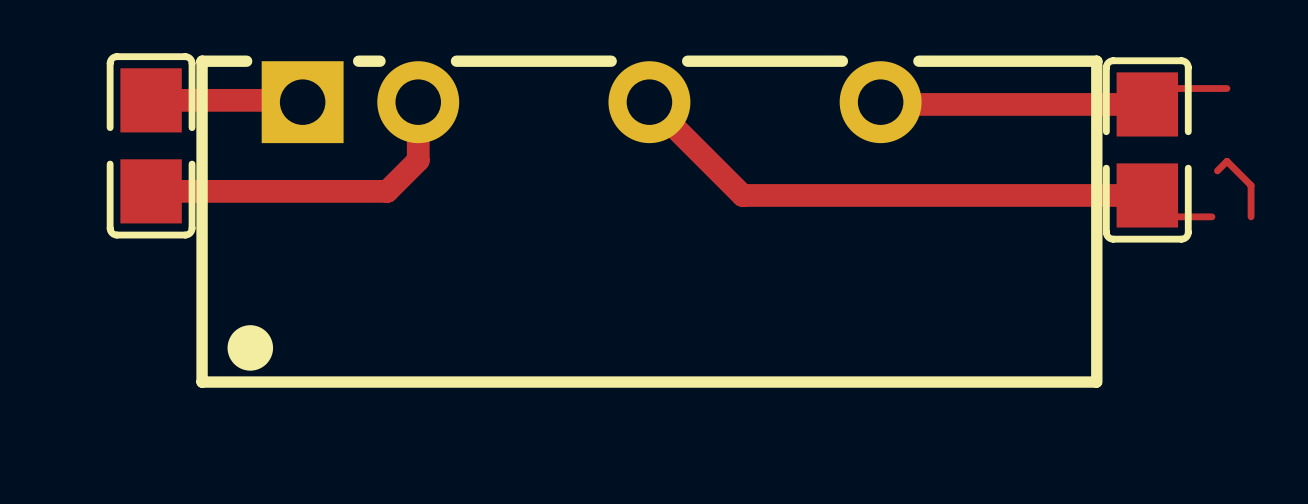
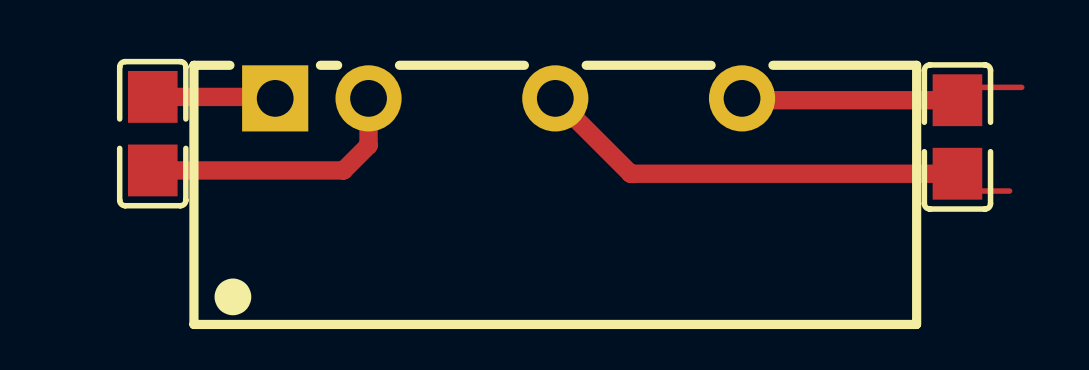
track: (1217, 170) (1226, 161) (1251, 185) (1251, 216) -> none

